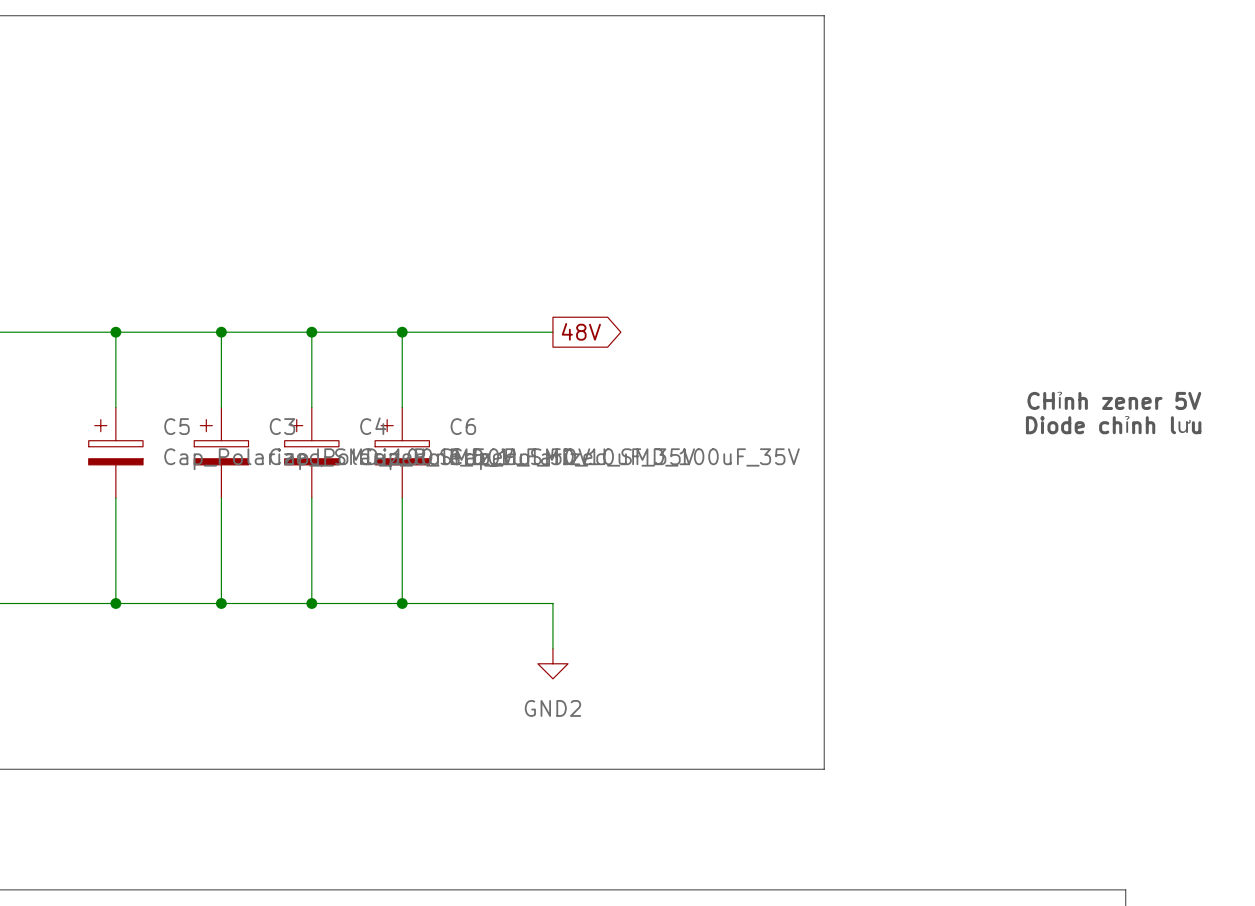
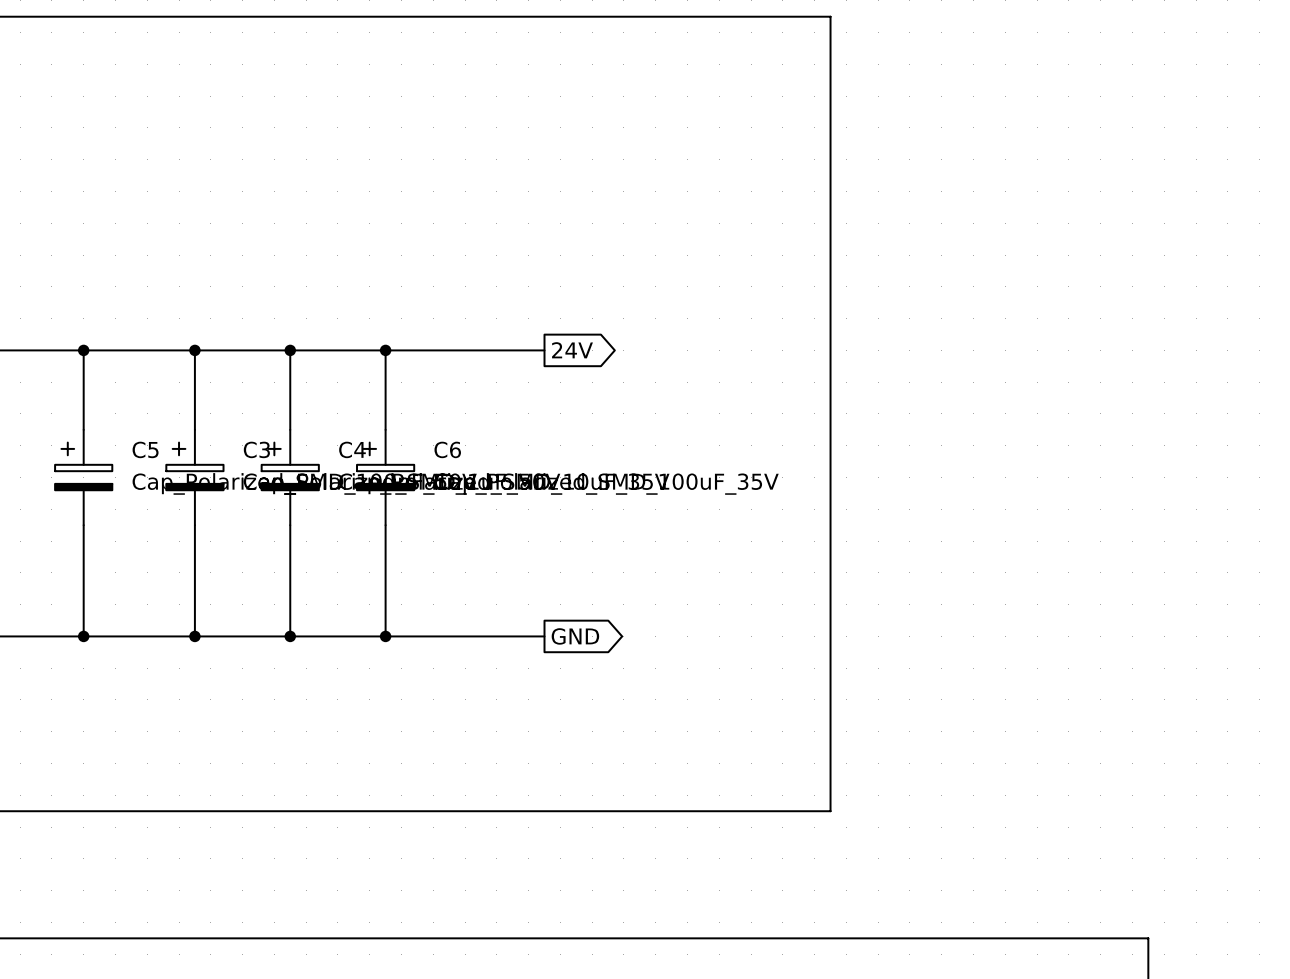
global label: 48V (581, 331) -> 24V (572, 350)
text: CHỉnh zener 5V (1114, 400) -> none
text: Diode chỉnh lưu (1113, 424) -> none
wire: (552, 603) (552, 648) -> none
global label: none -> GND (575, 636)
power symbol: GND2 (552, 663) -> none

